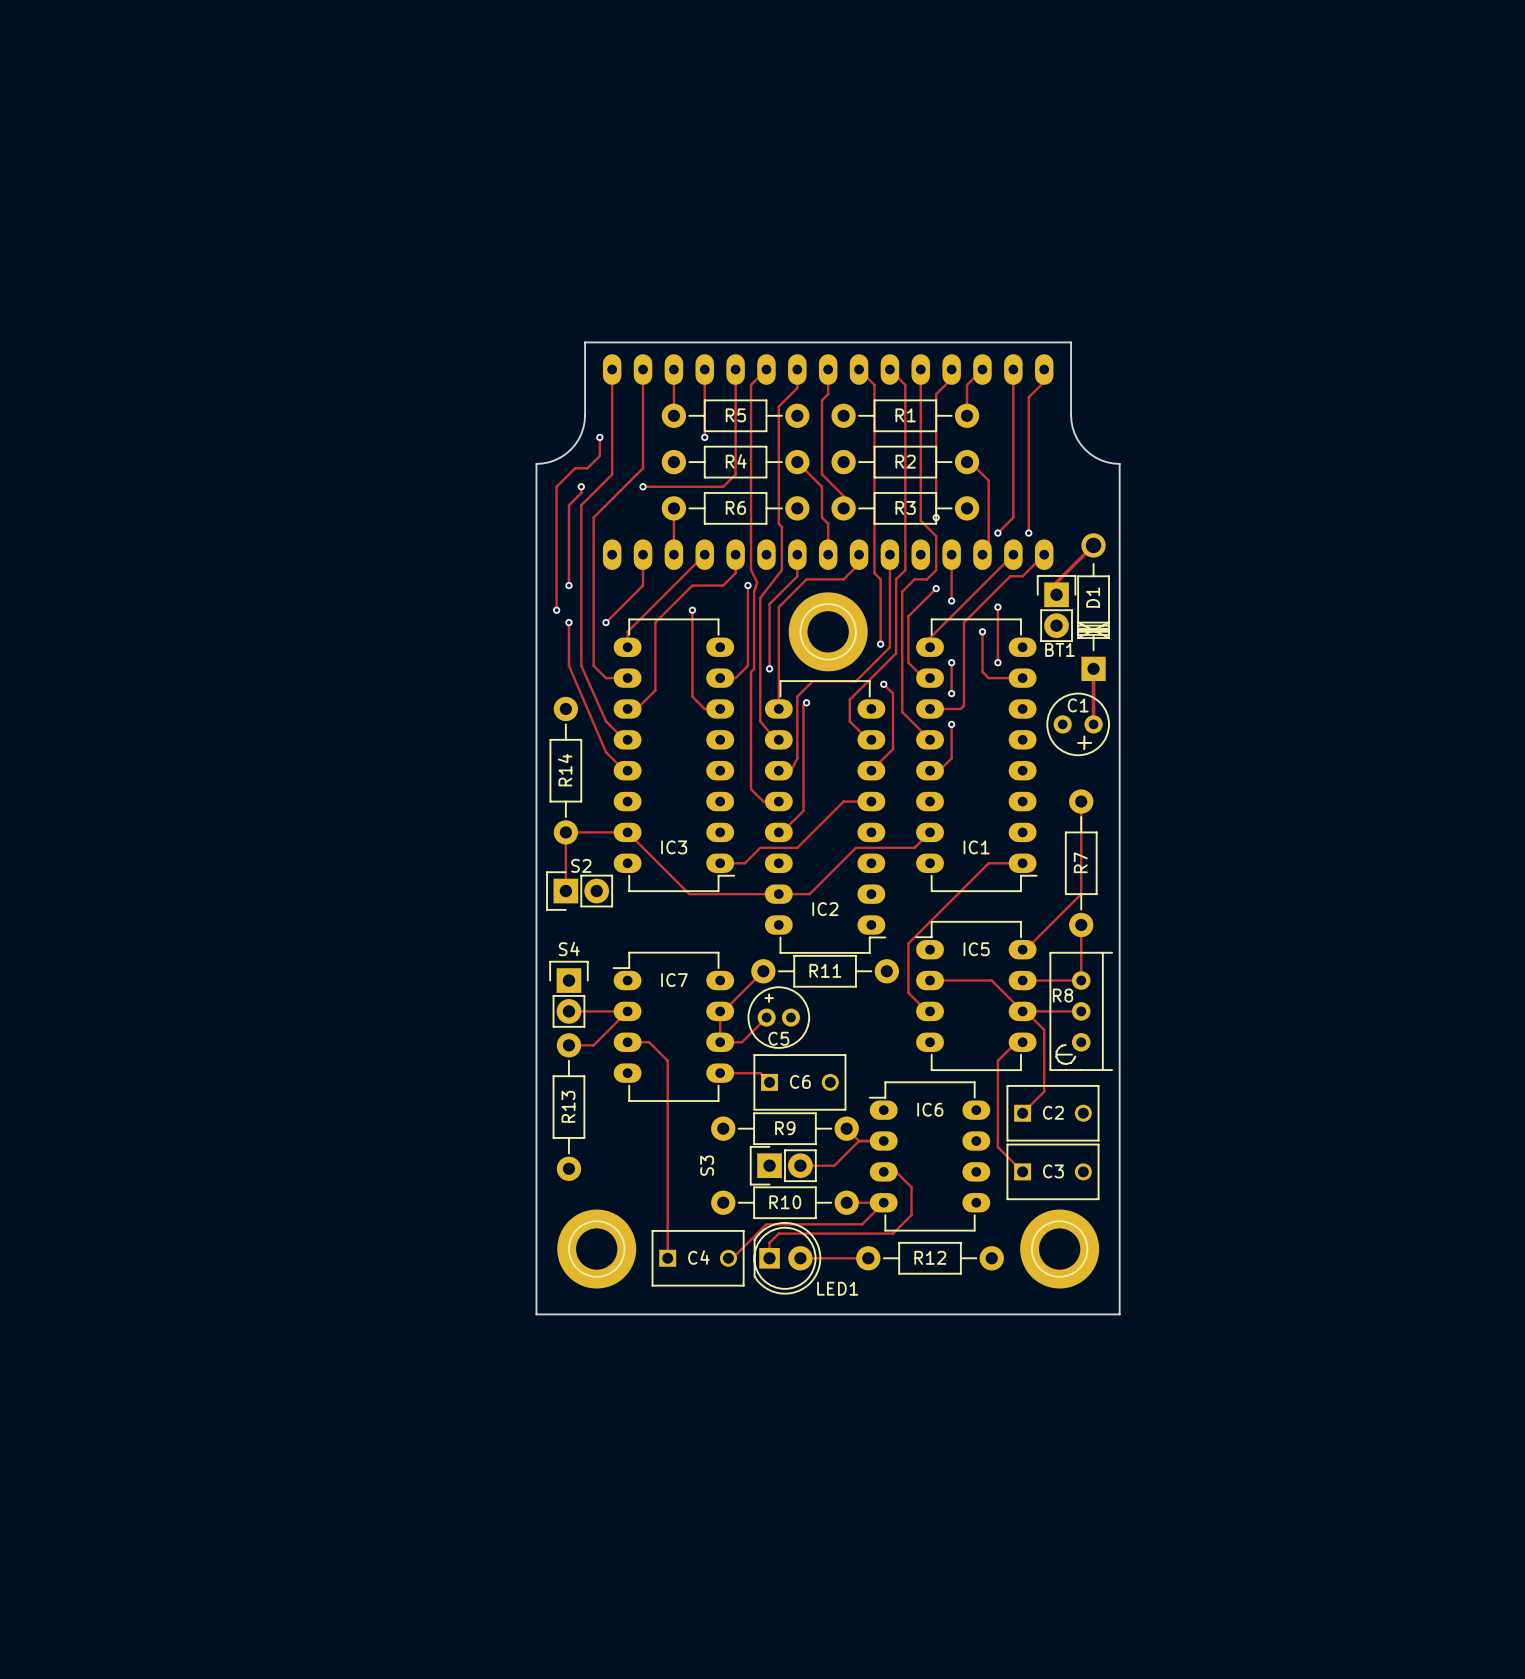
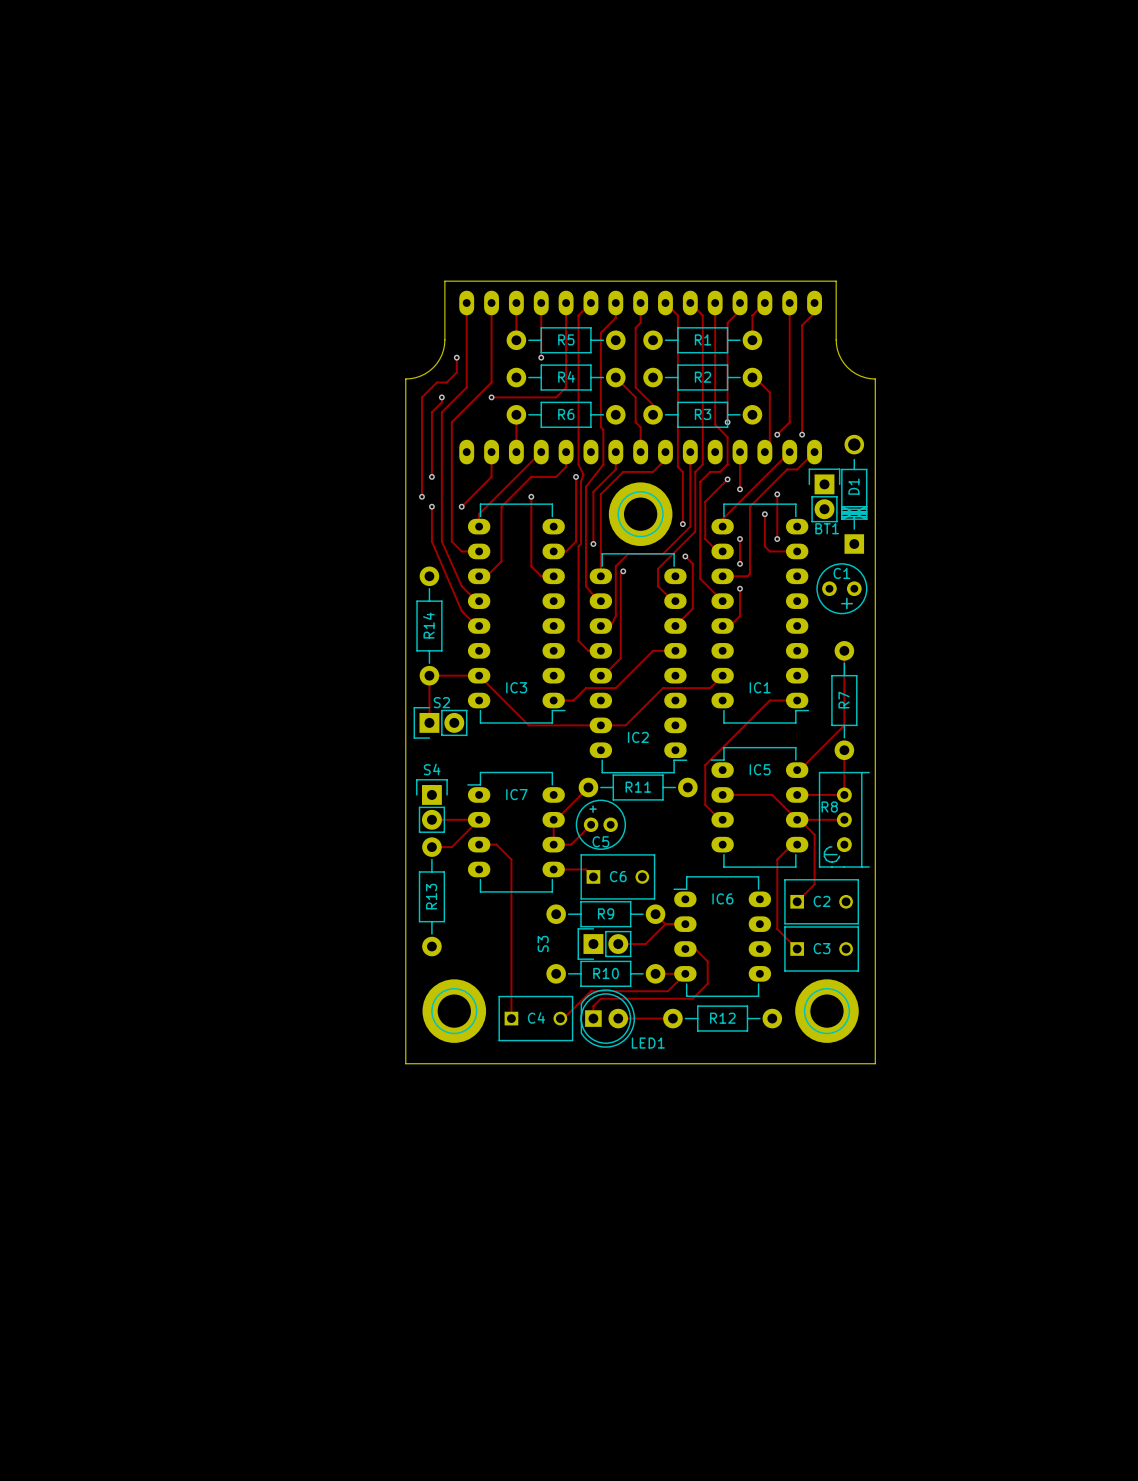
track: (1093, 545) (1056, 582) (1056, 594) -> none
track: (1093, 668) (1093, 724) -> none

